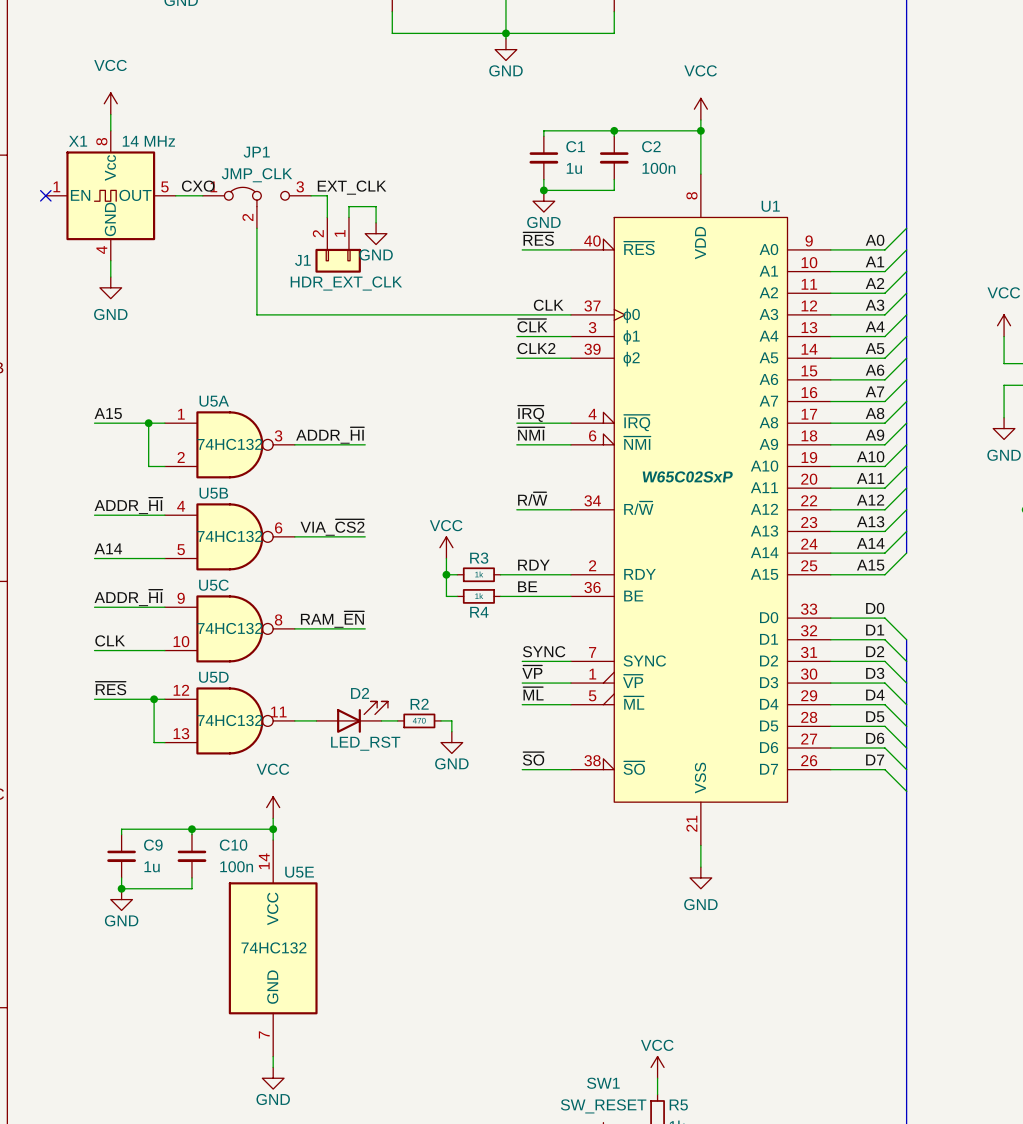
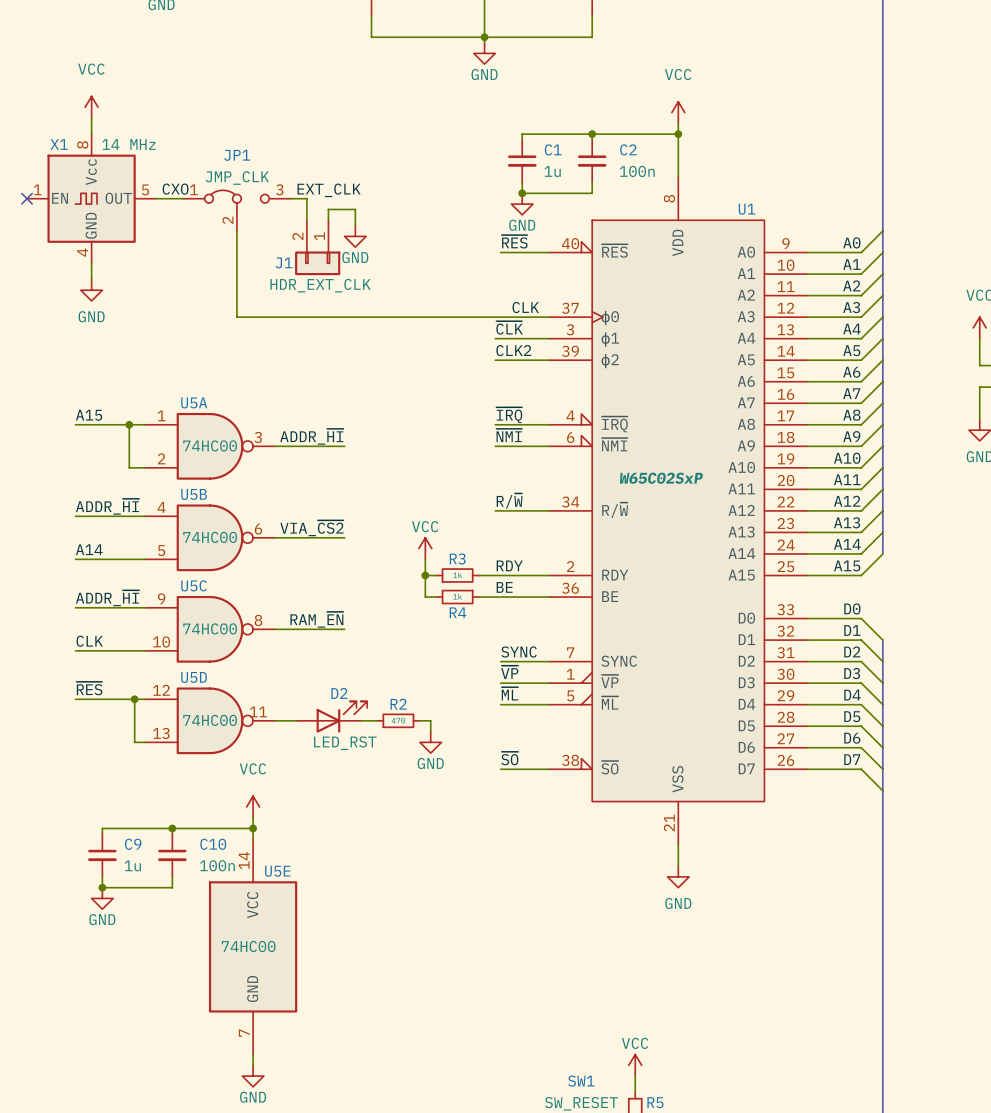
U5A value: 74HC132 (229, 444) -> 74HC00 (210, 445)
U5B value: 74HC132 (229, 536) -> 74HC00 (210, 537)
U5C value: 74HC132 (229, 628) -> 74HC00 (210, 628)
U5D value: 74HC132 (229, 720) -> 74HC00 (210, 720)
U5E value: 74HC132 (273, 947) -> 74HC00 (248, 946)

